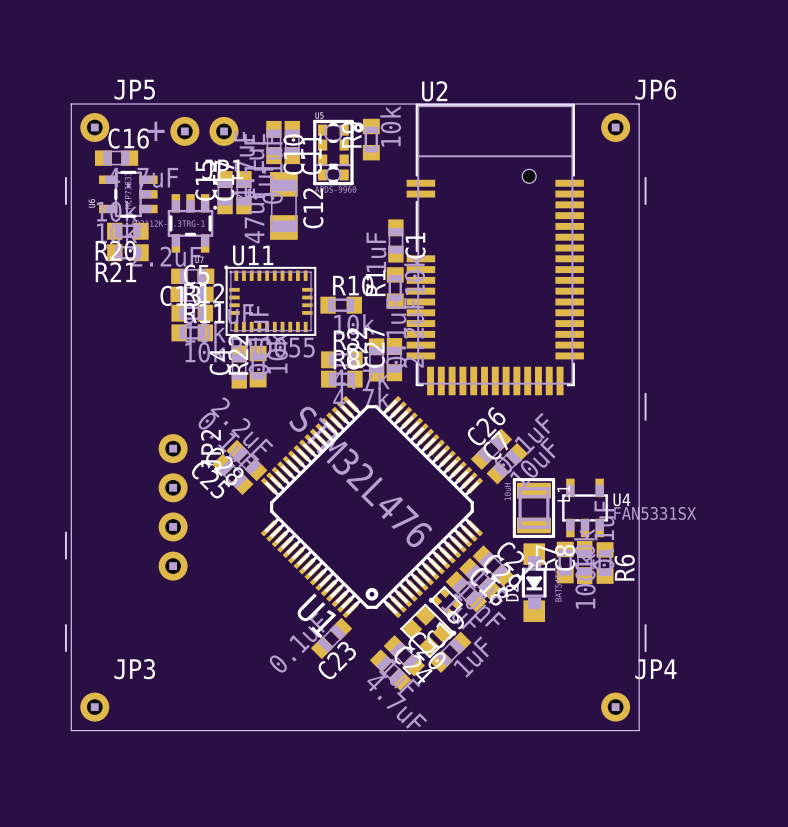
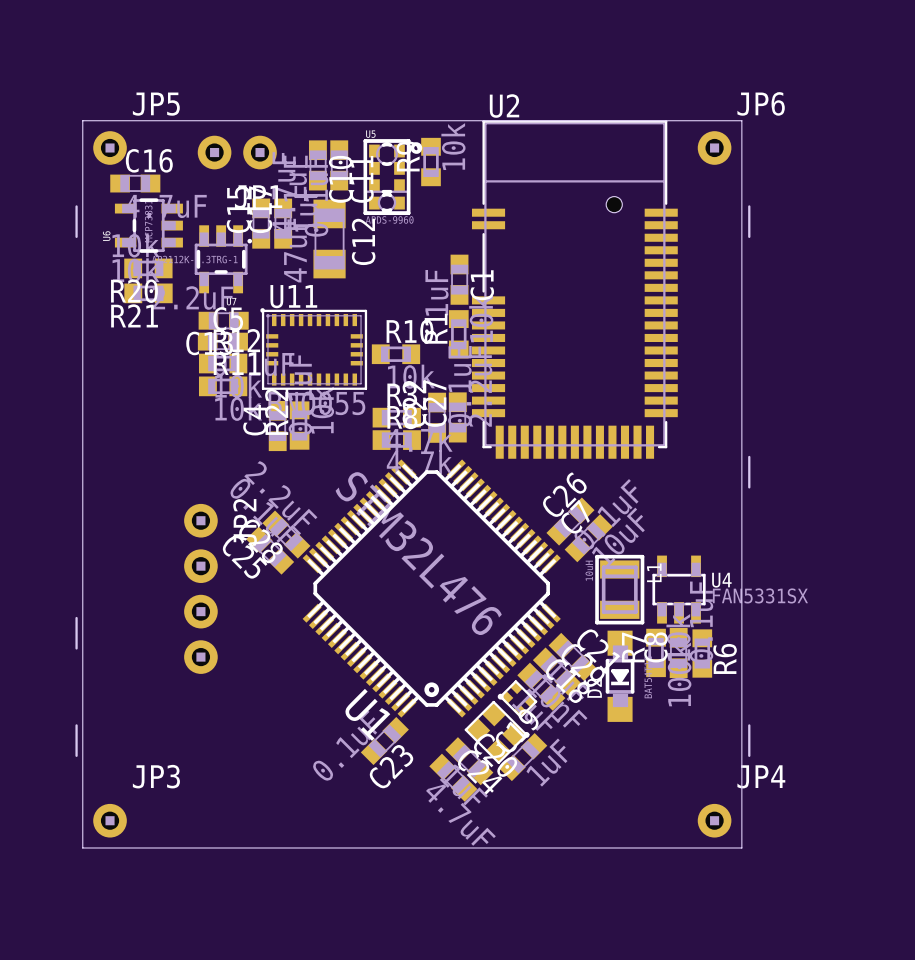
text: + (155, 131) -> none

